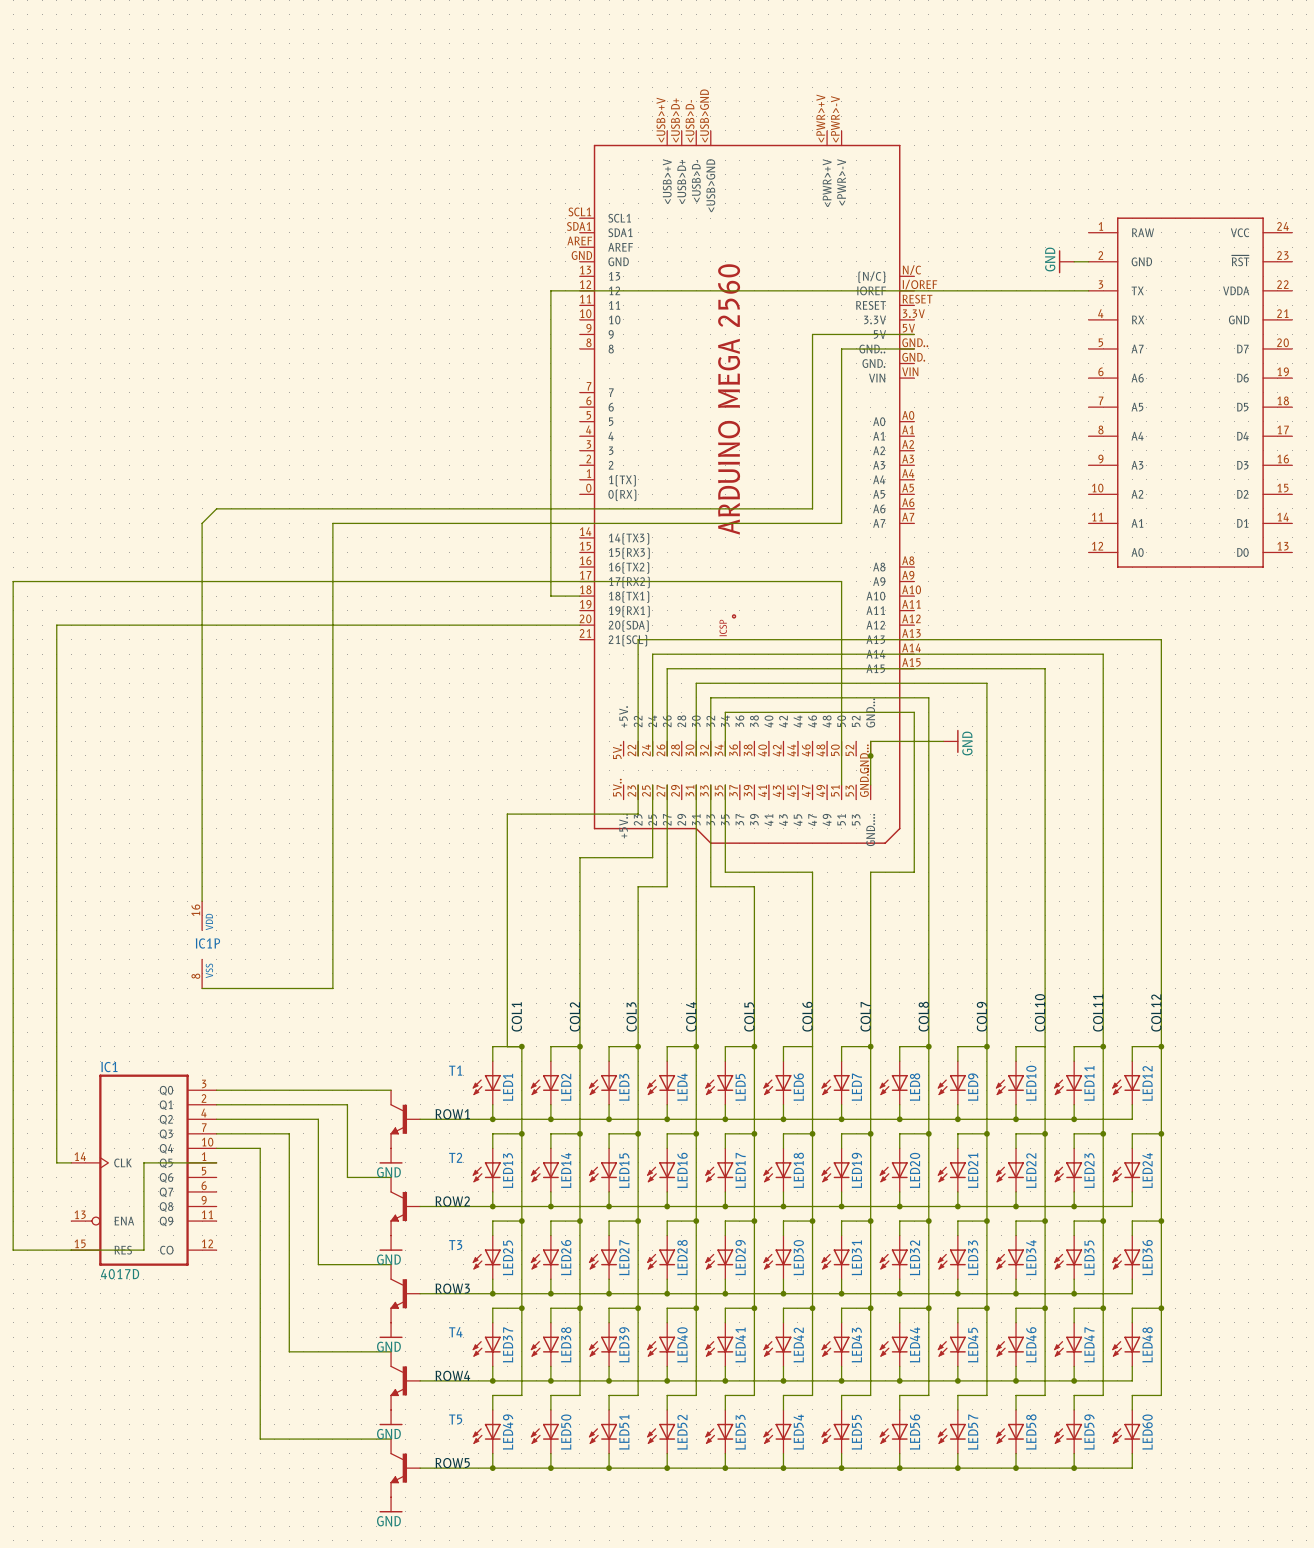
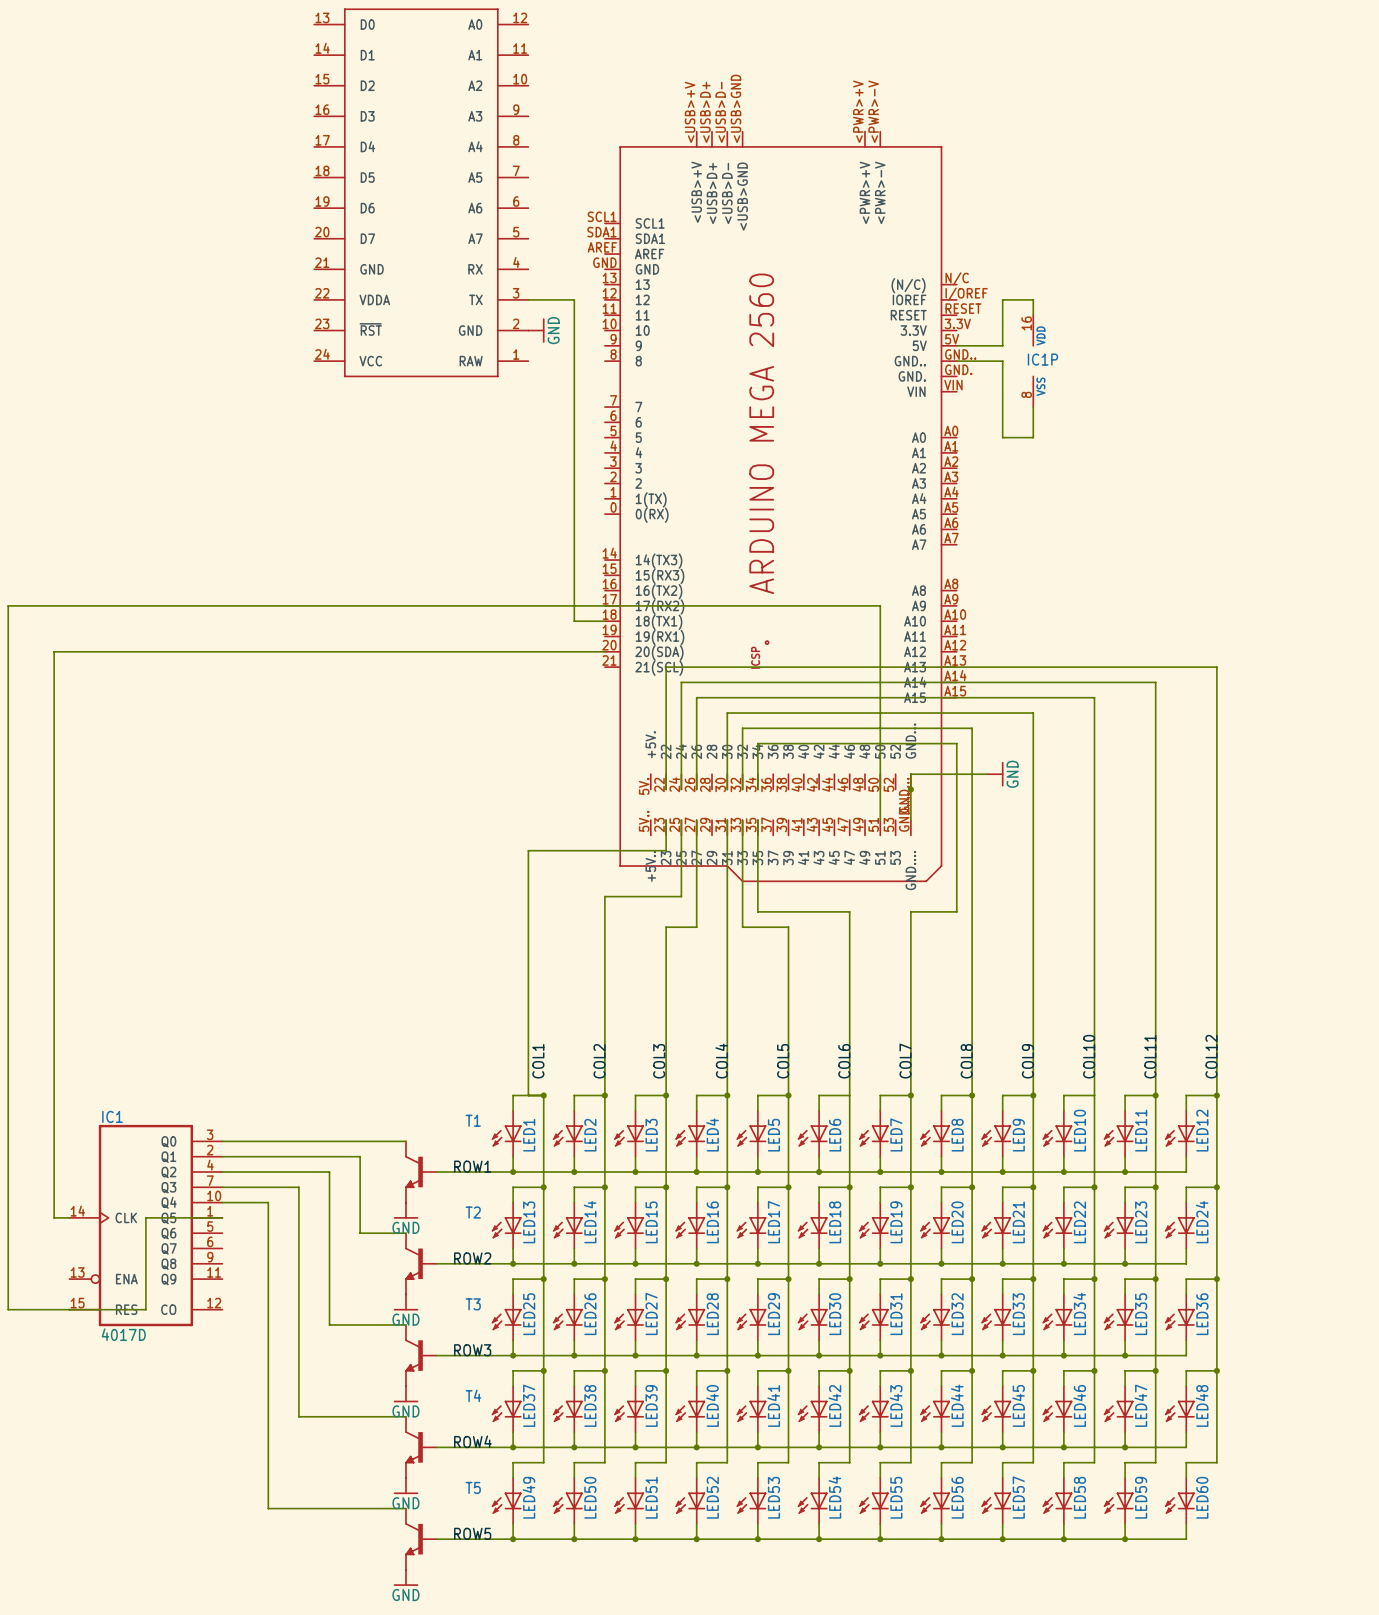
part: none -> (421, 192)
power symbol: GND (1066, 261) -> none
wire: (1074, 261) (1088, 261) -> none
wire: none -> (528, 299) (574, 299)
wire: (550, 290) (957, 290) -> (956, 345) (1002, 345) (1002, 299)
wire: (986, 290) (1088, 290) -> (1033, 299) (1033, 315)
power symbol: none -> GND (536, 330)
wire: (914, 334) (812, 334) (812, 508) (216, 508) (202, 523) (202, 901) -> none
wire: (914, 348) (841, 348) (841, 523) (332, 523) (332, 988) (202, 988) -> (956, 361) (1002, 361) (1002, 437) (1033, 437) (1033, 407)
part: (1190, 392) -> none
IC1P position: (202, 944) -> (1033, 361)

